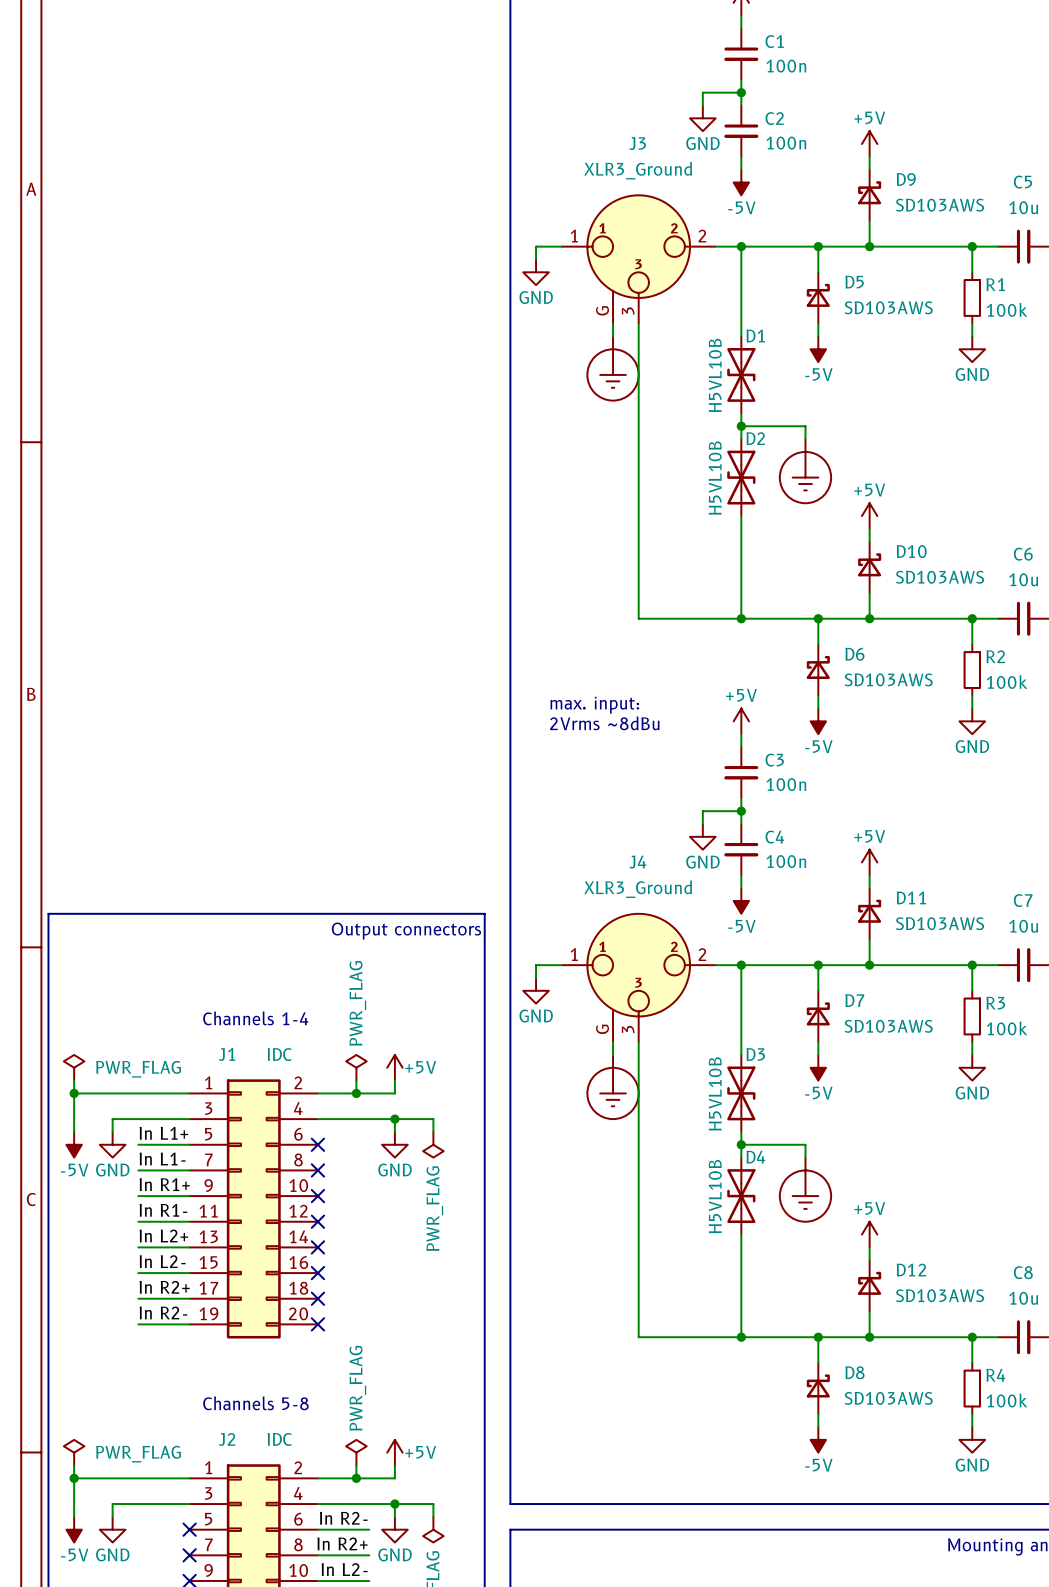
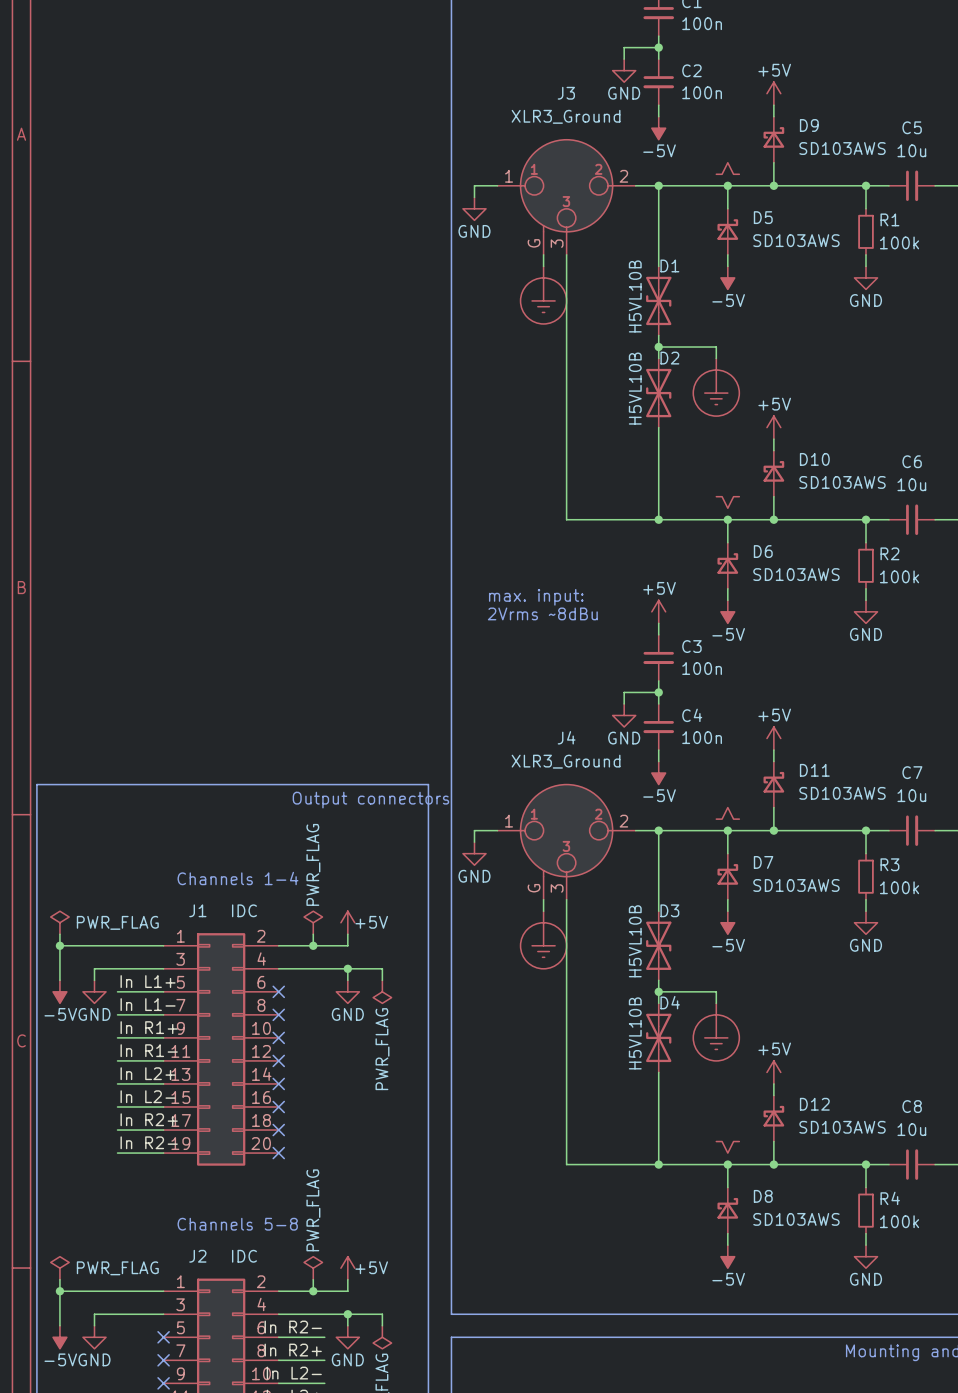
part: none -> (727, 168)
part: none -> (727, 502)
part: none -> (727, 813)
part: none -> (727, 1147)

